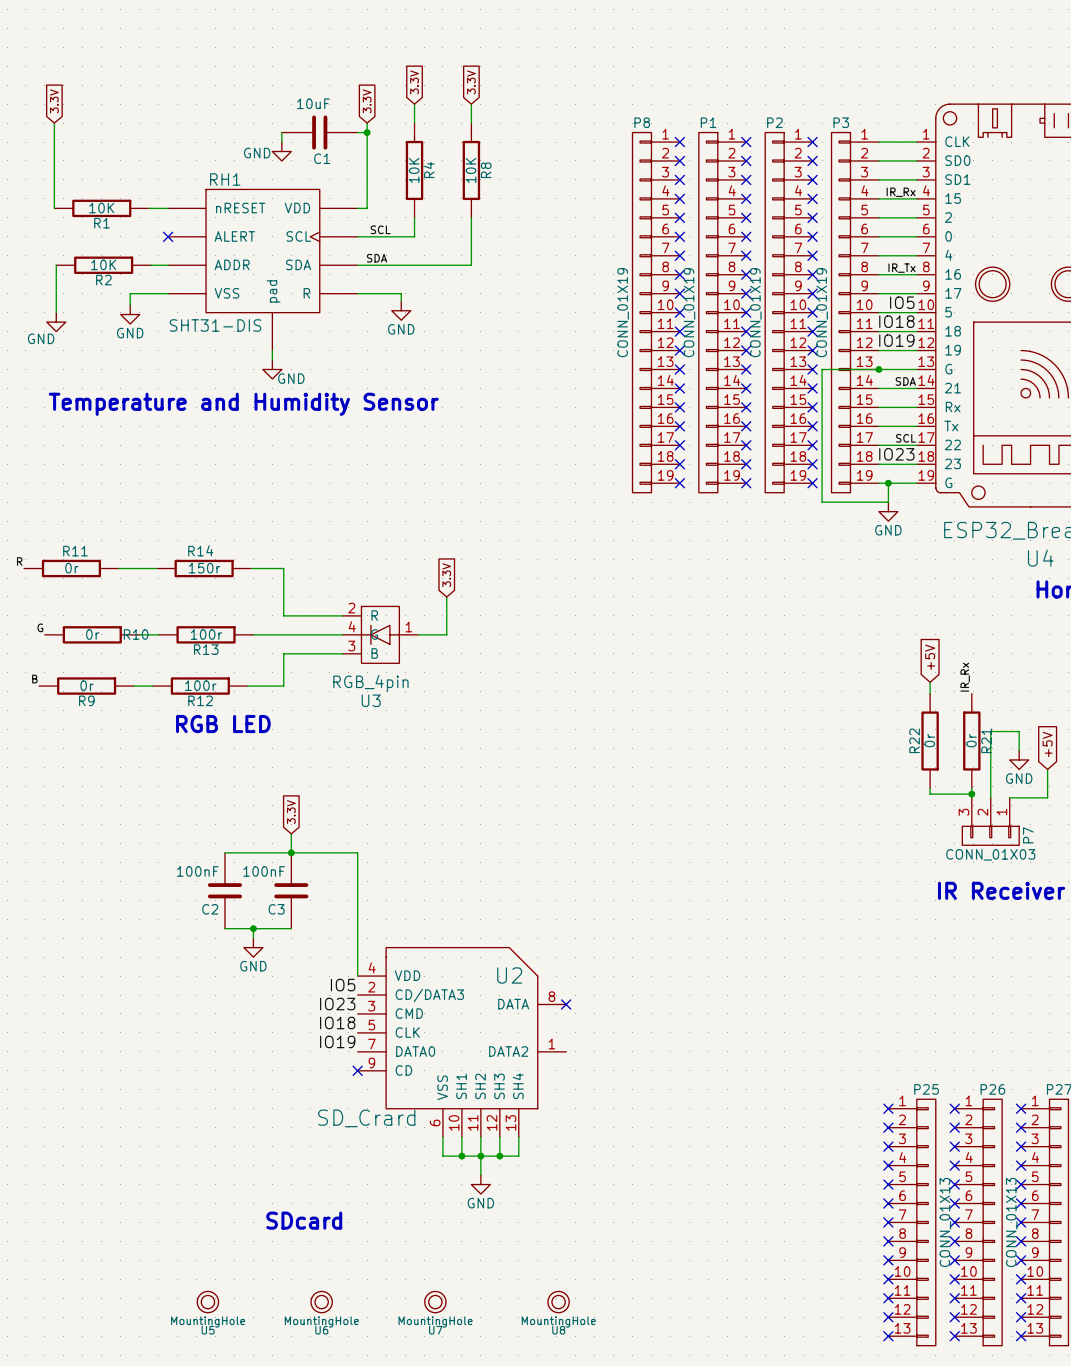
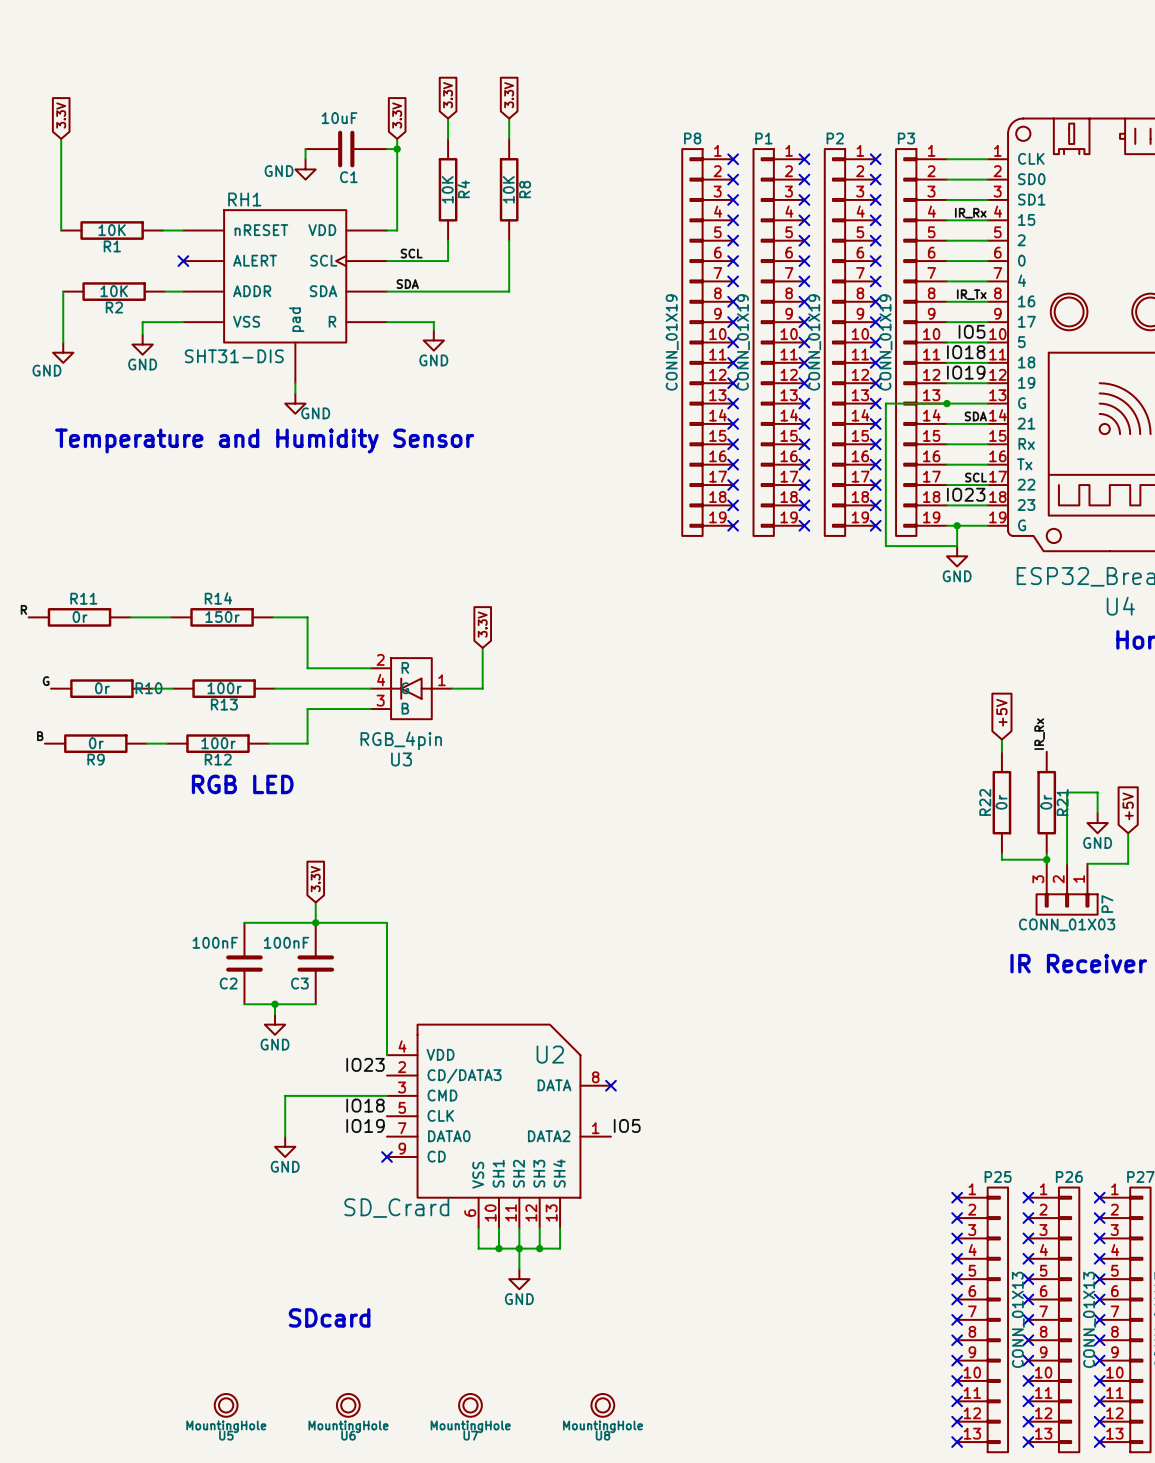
label: IO5 (343, 985) -> IO23 (365, 1064)
label: IO23 (337, 1004) -> none
wire: none -> (386, 1095) (285, 1095) (285, 1136)
label: none -> IO5 (627, 1125)
power symbol: none -> GND (285, 1146)

